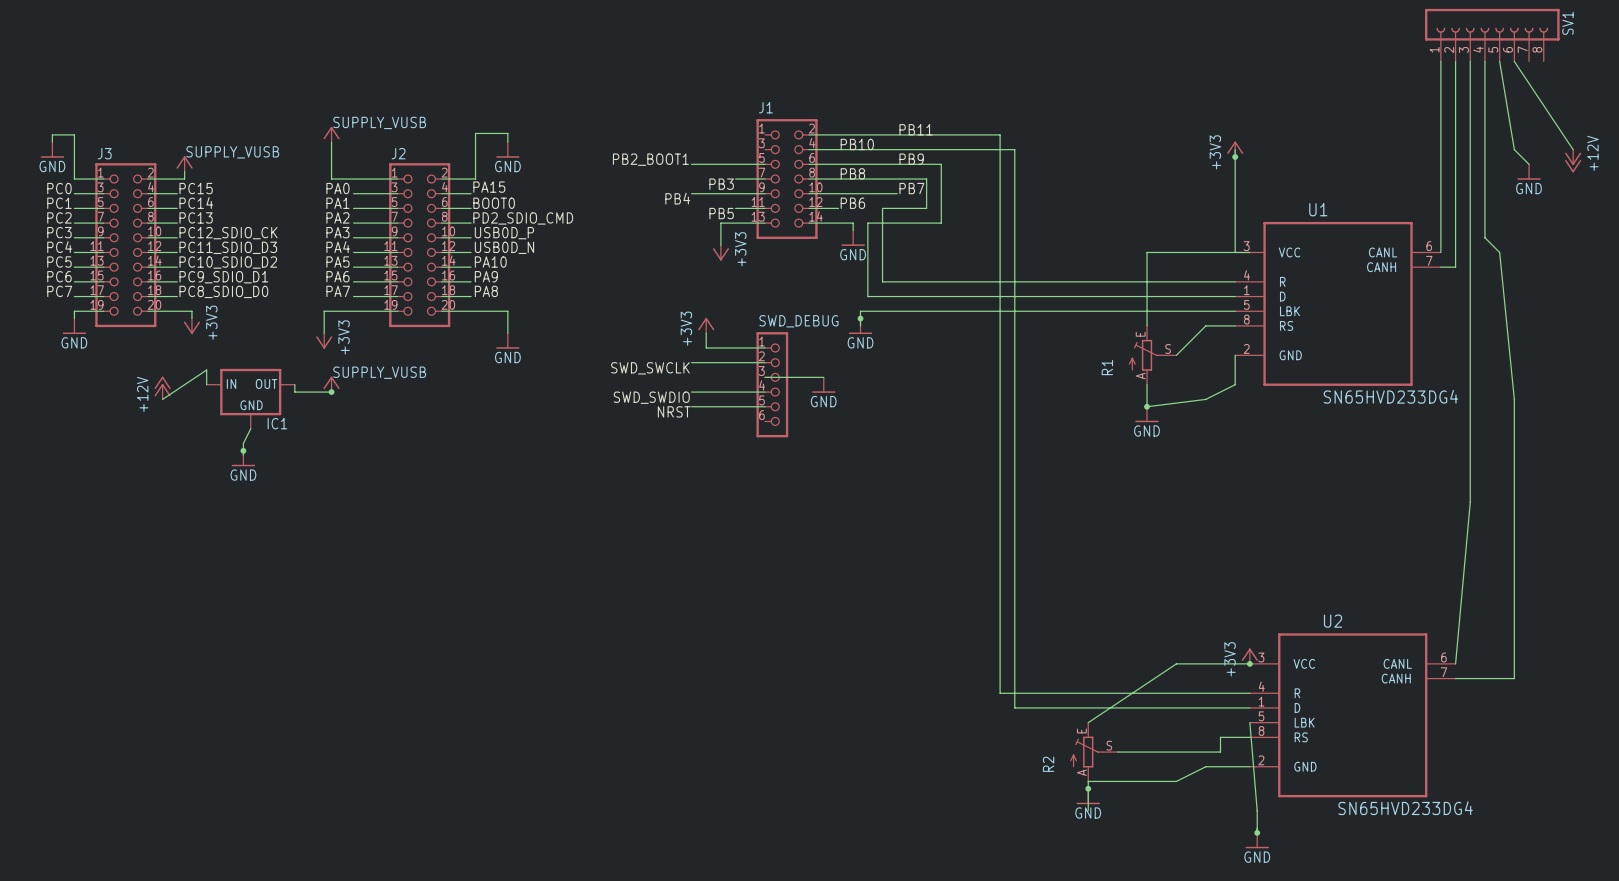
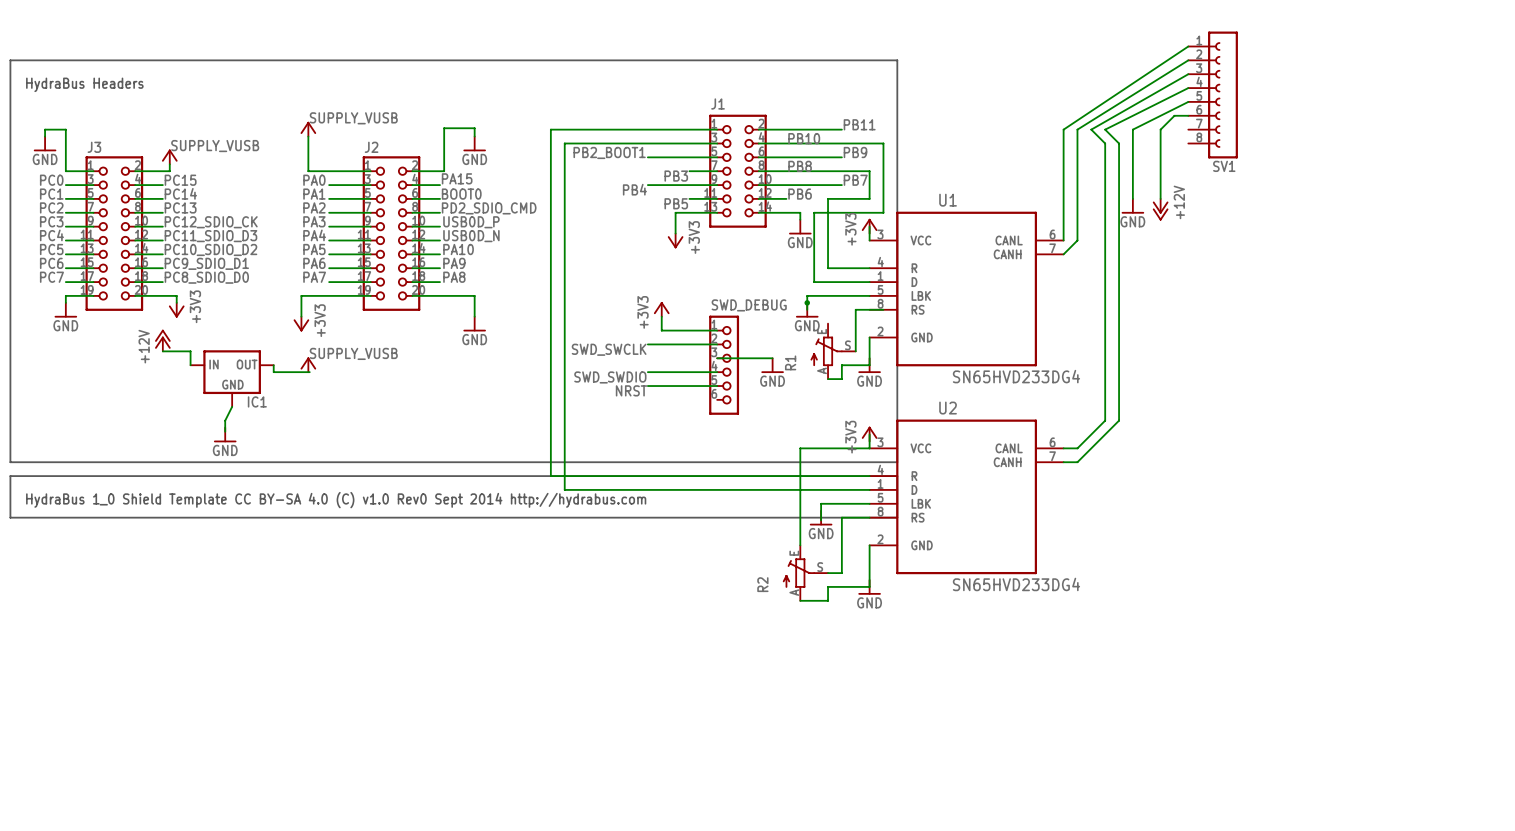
SV1 rotation: 0° (1492, 24) -> 90° clockwise (1222, 94)
SV1 position: (1492, 35) -> (1213, 94)
wire: none -> (1188, 46) (1063, 129) (1063, 240)
line: none -> (10, 60) (897, 60) (897, 462) (10, 462) (10, 60)
wire: none -> (1188, 60) (1077, 129) (1077, 240) (1063, 254)
wire: (1440, 61) (1440, 252) -> none
wire: (1455, 61) (1455, 267) (1440, 267) -> none
wire: (1470, 61) (1470, 502) (1455, 663) -> none
wire: (1484, 61) (1484, 237) (1499, 252) (1514, 399) (1514, 678) (1455, 678) -> none
wire: (1499, 61) (1514, 149) (1529, 164) -> none
wire: (1514, 61) (1573, 149) -> none
wire: none -> (1188, 74) (1091, 129) (1105, 143) (1105, 420) (1077, 448) (1063, 448)
text: none -> HydraBus Headers (84, 84)
wire: none -> (1188, 88) (1105, 129) (1119, 143) (1119, 420) (1077, 462) (1063, 462)
wire: none -> (1188, 101) (1132, 129) (1132, 198)
wire: none -> (1188, 115) (1174, 115) (1160, 129) (1160, 143)
wire: none -> (717, 129) (550, 129) (550, 476) (869, 476)
wire: (897, 134) (1000, 134) (1000, 693) (1249, 693) -> none
wire: none -> (717, 143) (564, 143) (564, 489) (869, 489)
wire: (941, 149) (1014, 149) (1014, 707) (1249, 707) -> none
power symbol: +3V3 (1235, 149) -> none
junction: (1235, 156) -> none
power symbol: +12V (1573, 161) -> none
wire: (897, 164) (941, 164) -> (883, 143) (883, 157)
power symbol: GND (1529, 172) -> none
wire: (1235, 208) (1235, 252) -> none
power symbol: none -> GND (1132, 206)
power symbol: none -> +12V (1160, 209)
wire: none -> (869, 226) (869, 240)
power symbol: none -> +3V3 (869, 226)
wire: (1249, 252) (1147, 252) (1147, 325) -> none
wire: (926, 281) (1235, 281) -> none
wire: (926, 296) (1235, 296) -> none
U1 position: (1338, 303) -> (966, 289)
wire: (926, 311) (1235, 311) -> none
wire: none -> (883, 309) (855, 309) (855, 351)
wire: (1235, 325) (1205, 325) (1176, 355) -> none
wire: none -> (869, 337) (869, 365) (841, 365) (841, 379) (828, 379)
R1 position: (1152, 355) -> (833, 351)
wire: (1235, 355) (1235, 384) (1205, 399) (1147, 406) (1147, 384) -> none
wire: (206, 370) (162, 399) -> (190, 351) (162, 351)
power symbol: none -> GND (869, 365)
power symbol position: +12V (162, 388) -> +12V (162, 340)
junction: (331, 392) -> none
junction: (1147, 406) -> none
power symbol: GND (1147, 414) -> none
junction: (243, 450) -> none
power symbol: none -> +3V3 (869, 434)
wire: none -> (869, 434) (869, 448) (800, 448) (800, 545)
line: none -> (10, 476) (10, 517) (897, 517) (897, 476) (10, 476)
text: none -> HydraBus 1_0 Shield Template CC BY-SA 4.0 (C) v1.0 Rev0 Sept 2014 http://hydrabus.com (336, 500)
wire: none -> (869, 503) (821, 503) (821, 520)
power symbol: none -> GND (821, 518)
wire: none -> (869, 517) (841, 517) (841, 573) (828, 573)
wire: none -> (869, 545) (869, 586) (828, 586) (828, 600) (800, 600)
power symbol: none -> GND (869, 587)
power symbol: +3V3 (1249, 656) -> none
wire: (1249, 663) (1176, 663) (1088, 722) -> none
junction: (1249, 663) -> none
U2 position: (1352, 715) -> (966, 496)
wire: (1249, 722) (1257, 832) -> none
wire: (1249, 737) (1220, 737) (1220, 752) (1117, 752) -> none
R2 position: (1093, 752) -> (805, 573)
wire: (1249, 766) (1205, 766) (1176, 781) (1088, 781) (1088, 810) -> none
junction: (1088, 788) -> none
power symbol: GND (1088, 796) -> none
junction: (1257, 832) -> none
power symbol: GND (1257, 840) -> none

